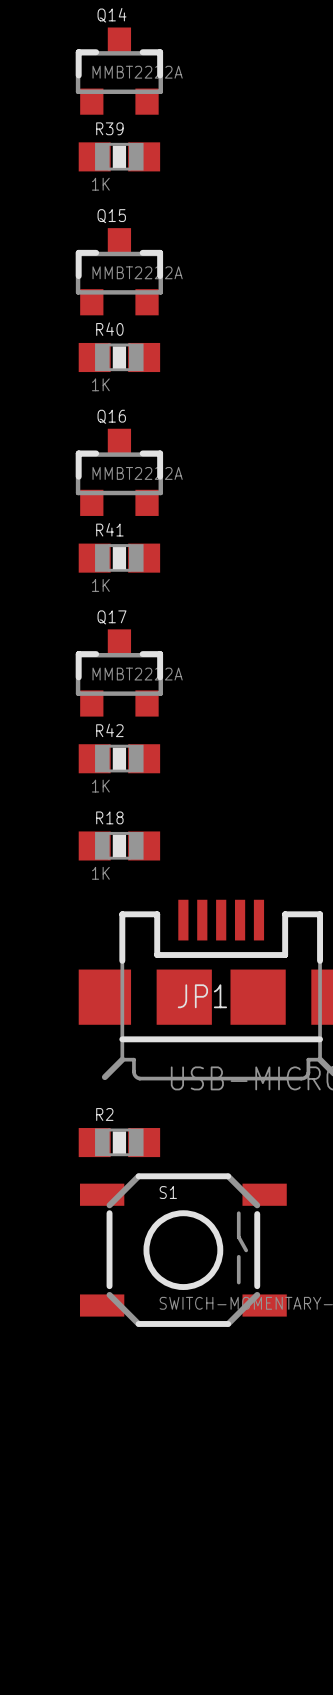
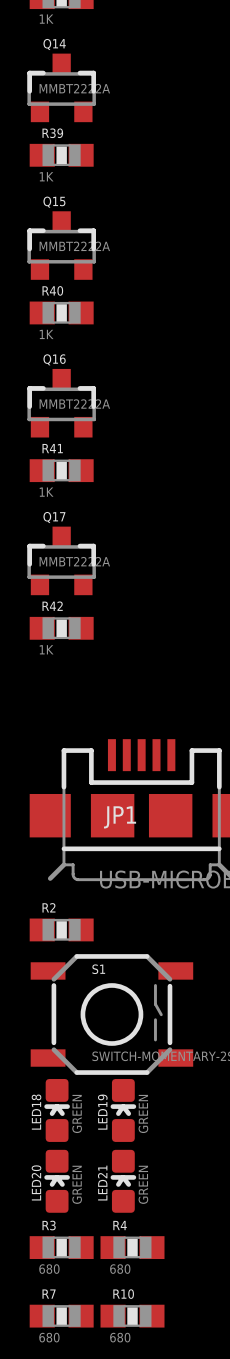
R18: 1K (119, 845) -> none
LED18: none -> GREEN (57, 1110)
LED19: none -> GREEN (123, 1110)
LED20: none -> GREEN (57, 1181)
LED21: none -> GREEN (123, 1181)
R3: none -> 680 (61, 1247)
R4: none -> 680 (132, 1247)
R7: none -> 680 (61, 1316)
R10: none -> 680 (132, 1316)

